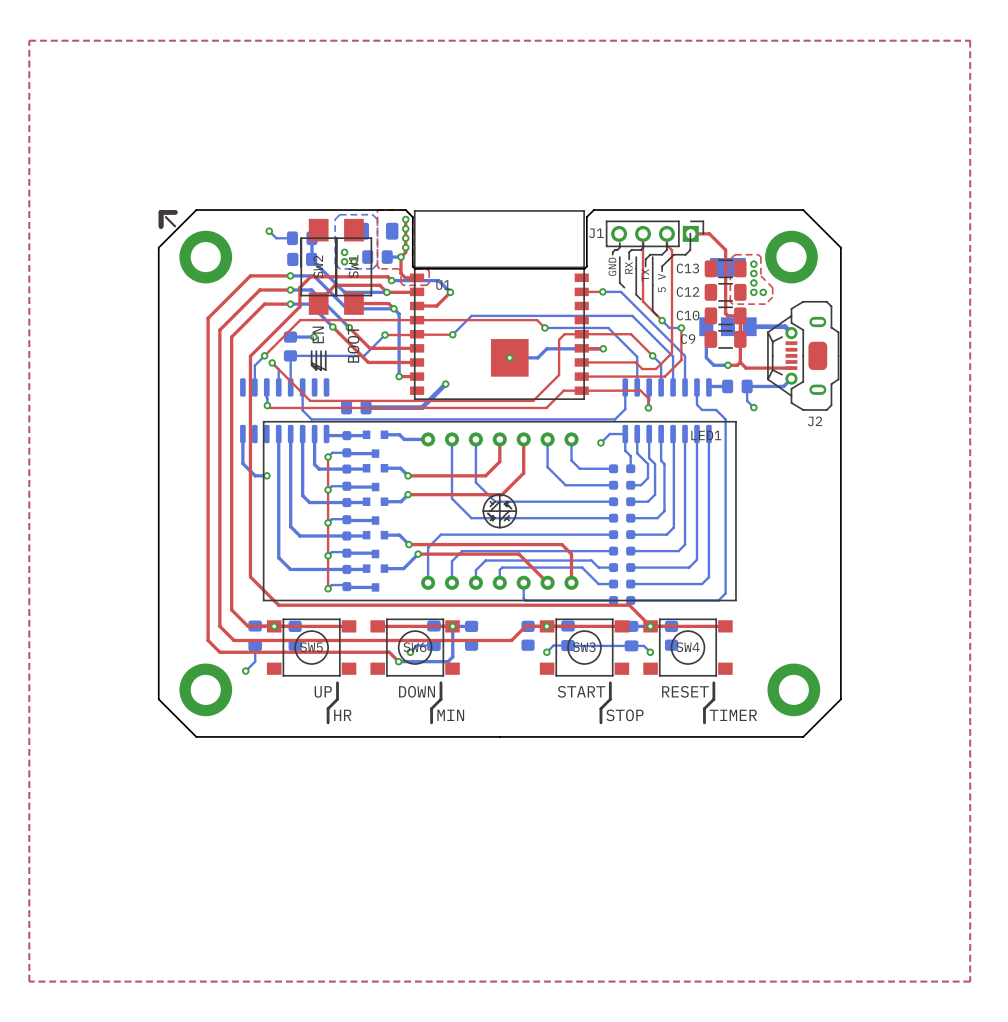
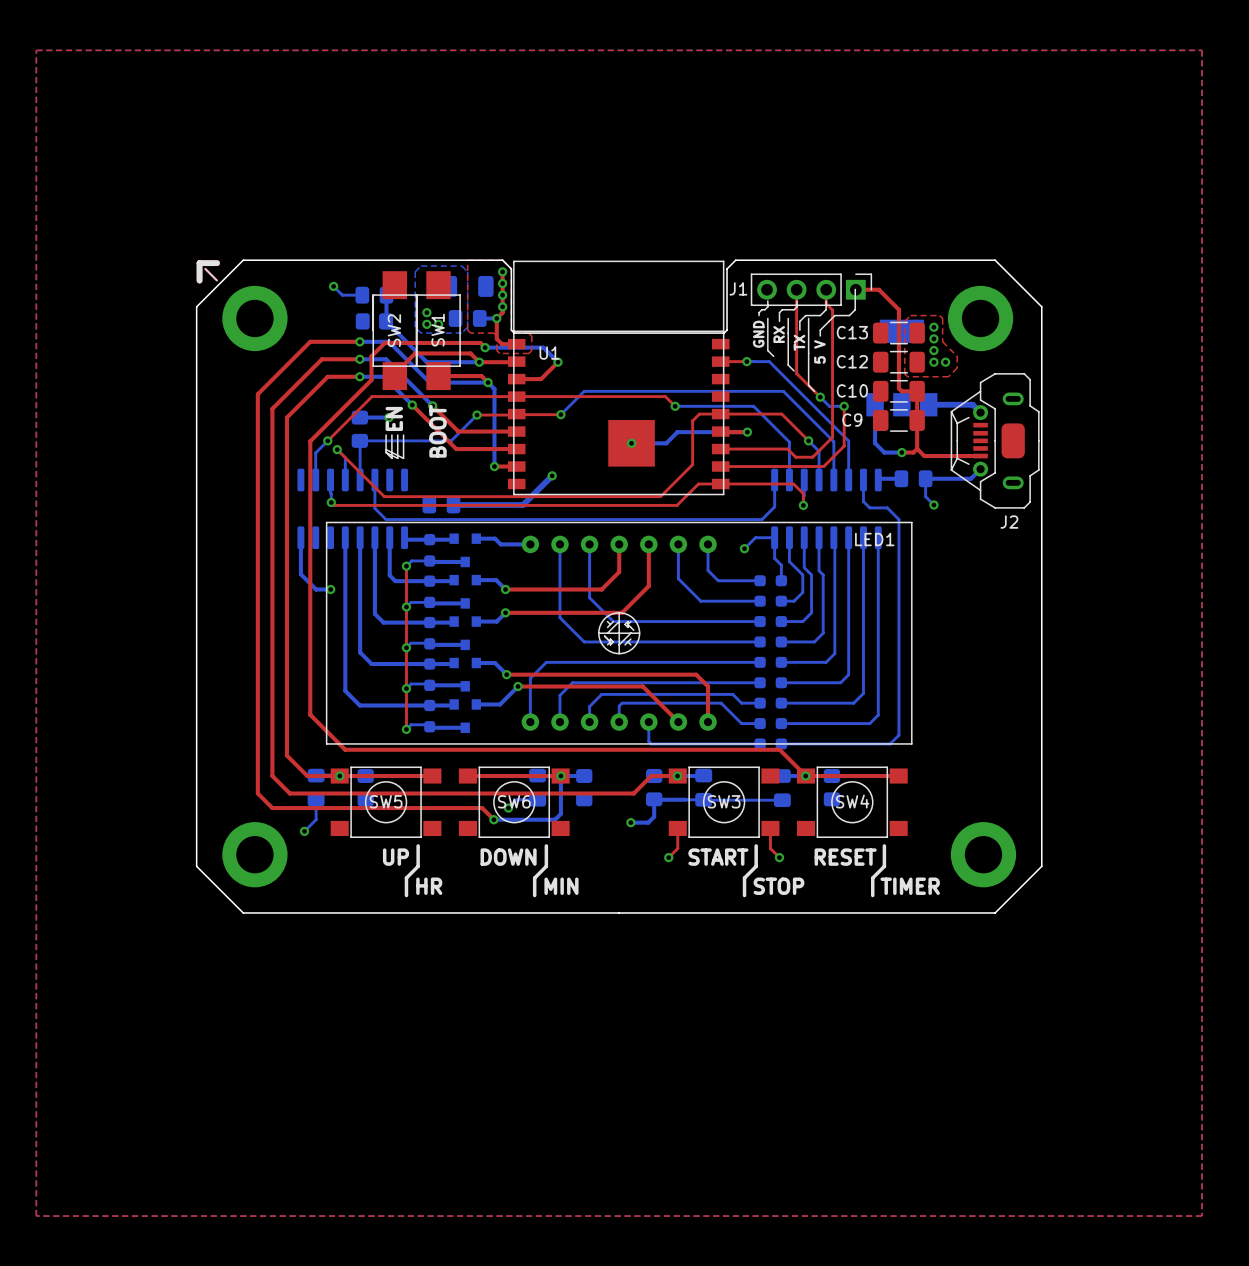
top track: (547, 626) (621, 626) -> none
bottom track: (553, 645) (546, 652) -> (685, 799) (654, 799) (654, 816) (648, 822) (630, 822)
bottom track: (631, 645) (644, 645) (650, 652) -> none
via: (546, 652) -> none
via position: (650, 652) -> (779, 857)
via: none -> (630, 822)
top track: none -> (677, 828) (677, 848) (668, 857)
top track: none -> (770, 828) (770, 848) (779, 857)
via: none -> (668, 857)

